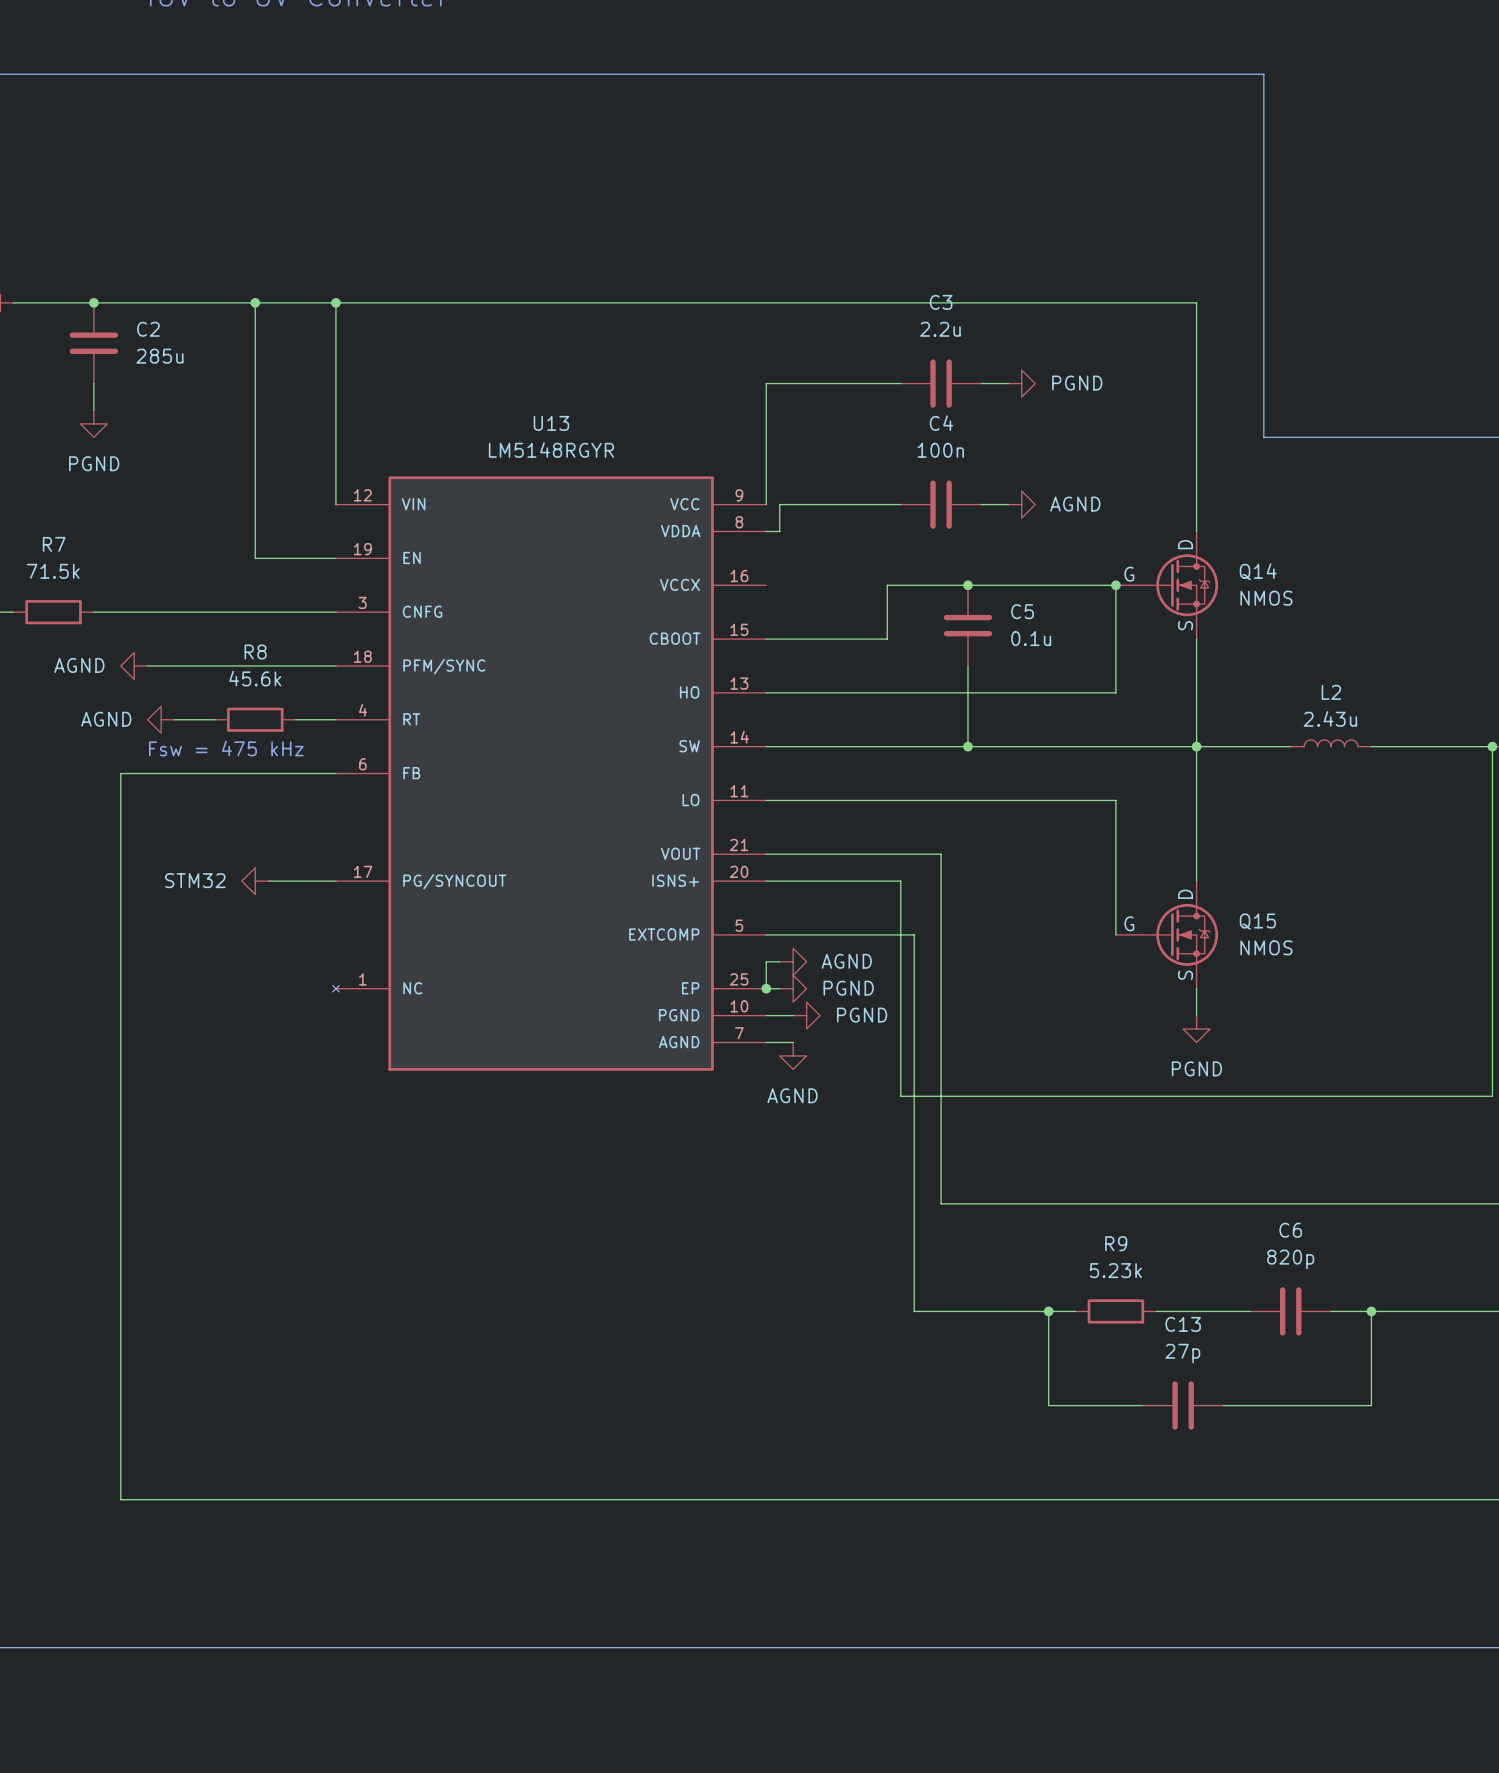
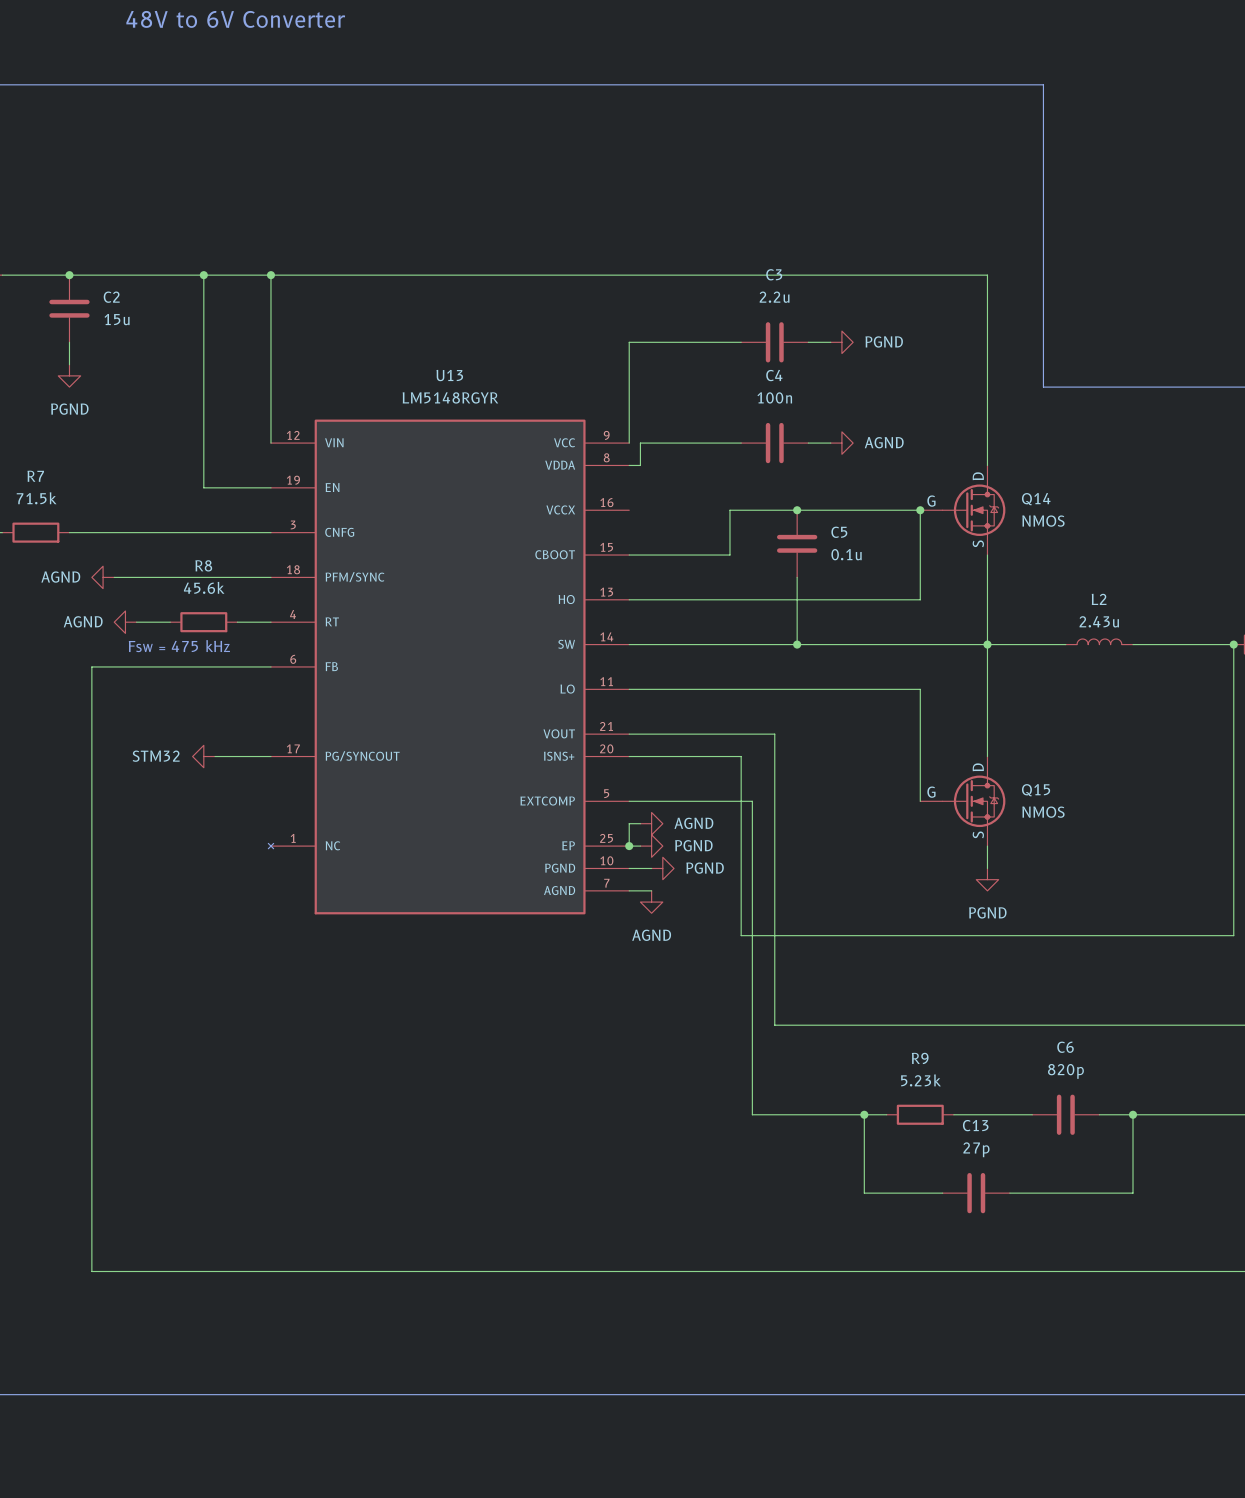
C2 value: 285u (159, 356) -> 15u (117, 319)

